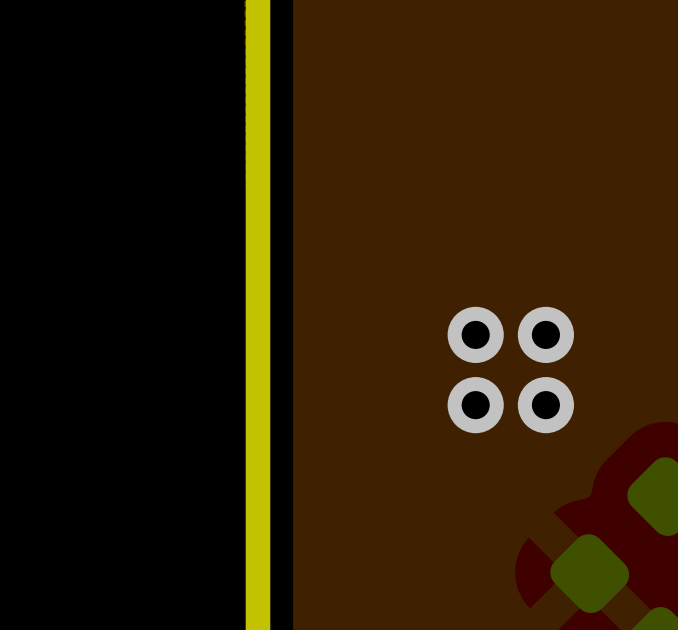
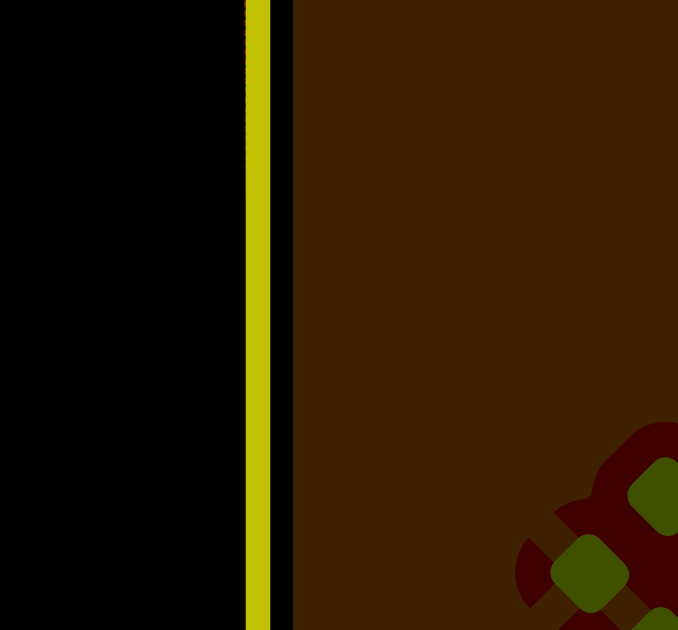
via: (475, 334) -> none
via: (545, 334) -> none
via: (475, 405) -> none
via: (545, 405) -> none

